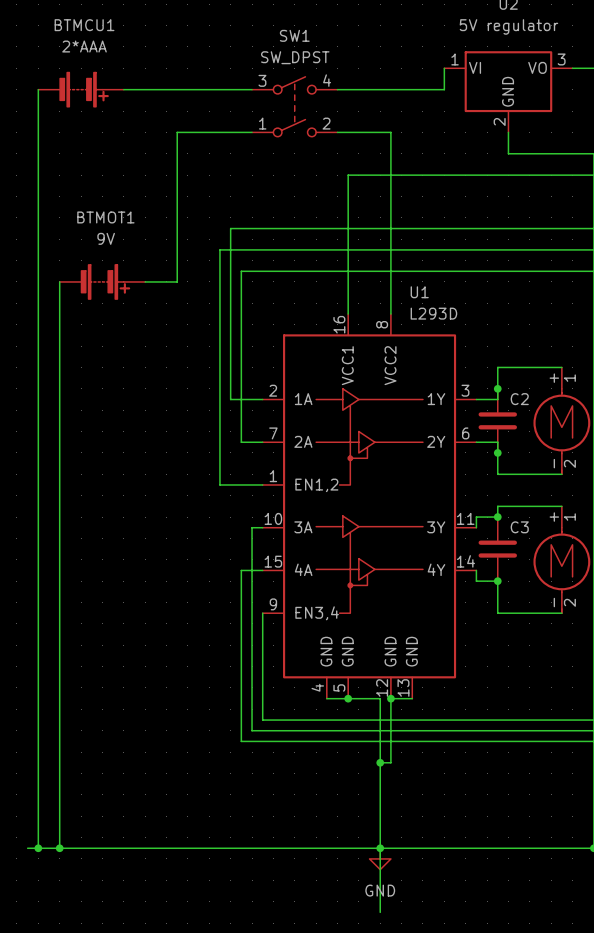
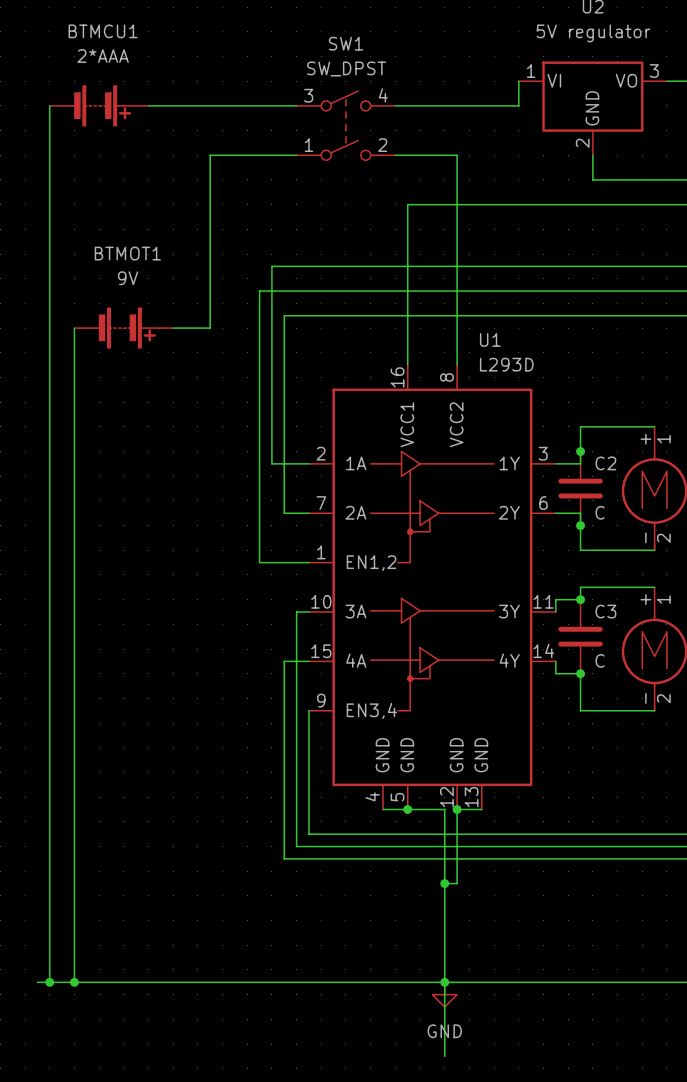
C2 value: none -> C (600, 512)
C3 value: none -> C (600, 660)

